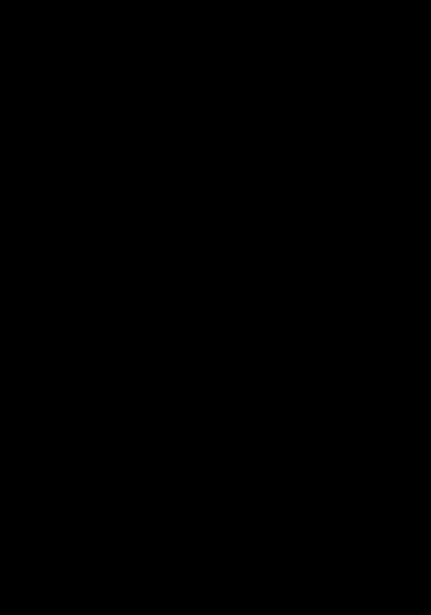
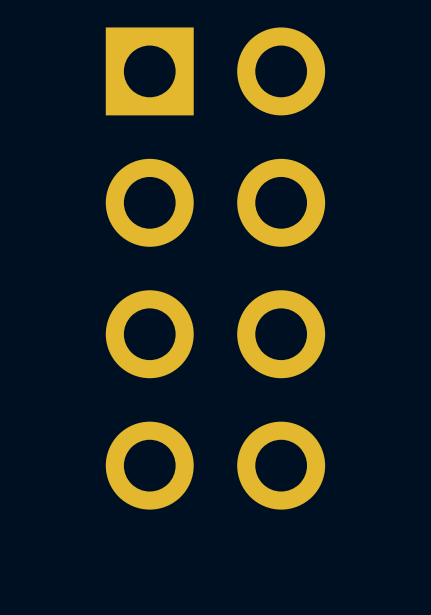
part: none -> (215, 268)

